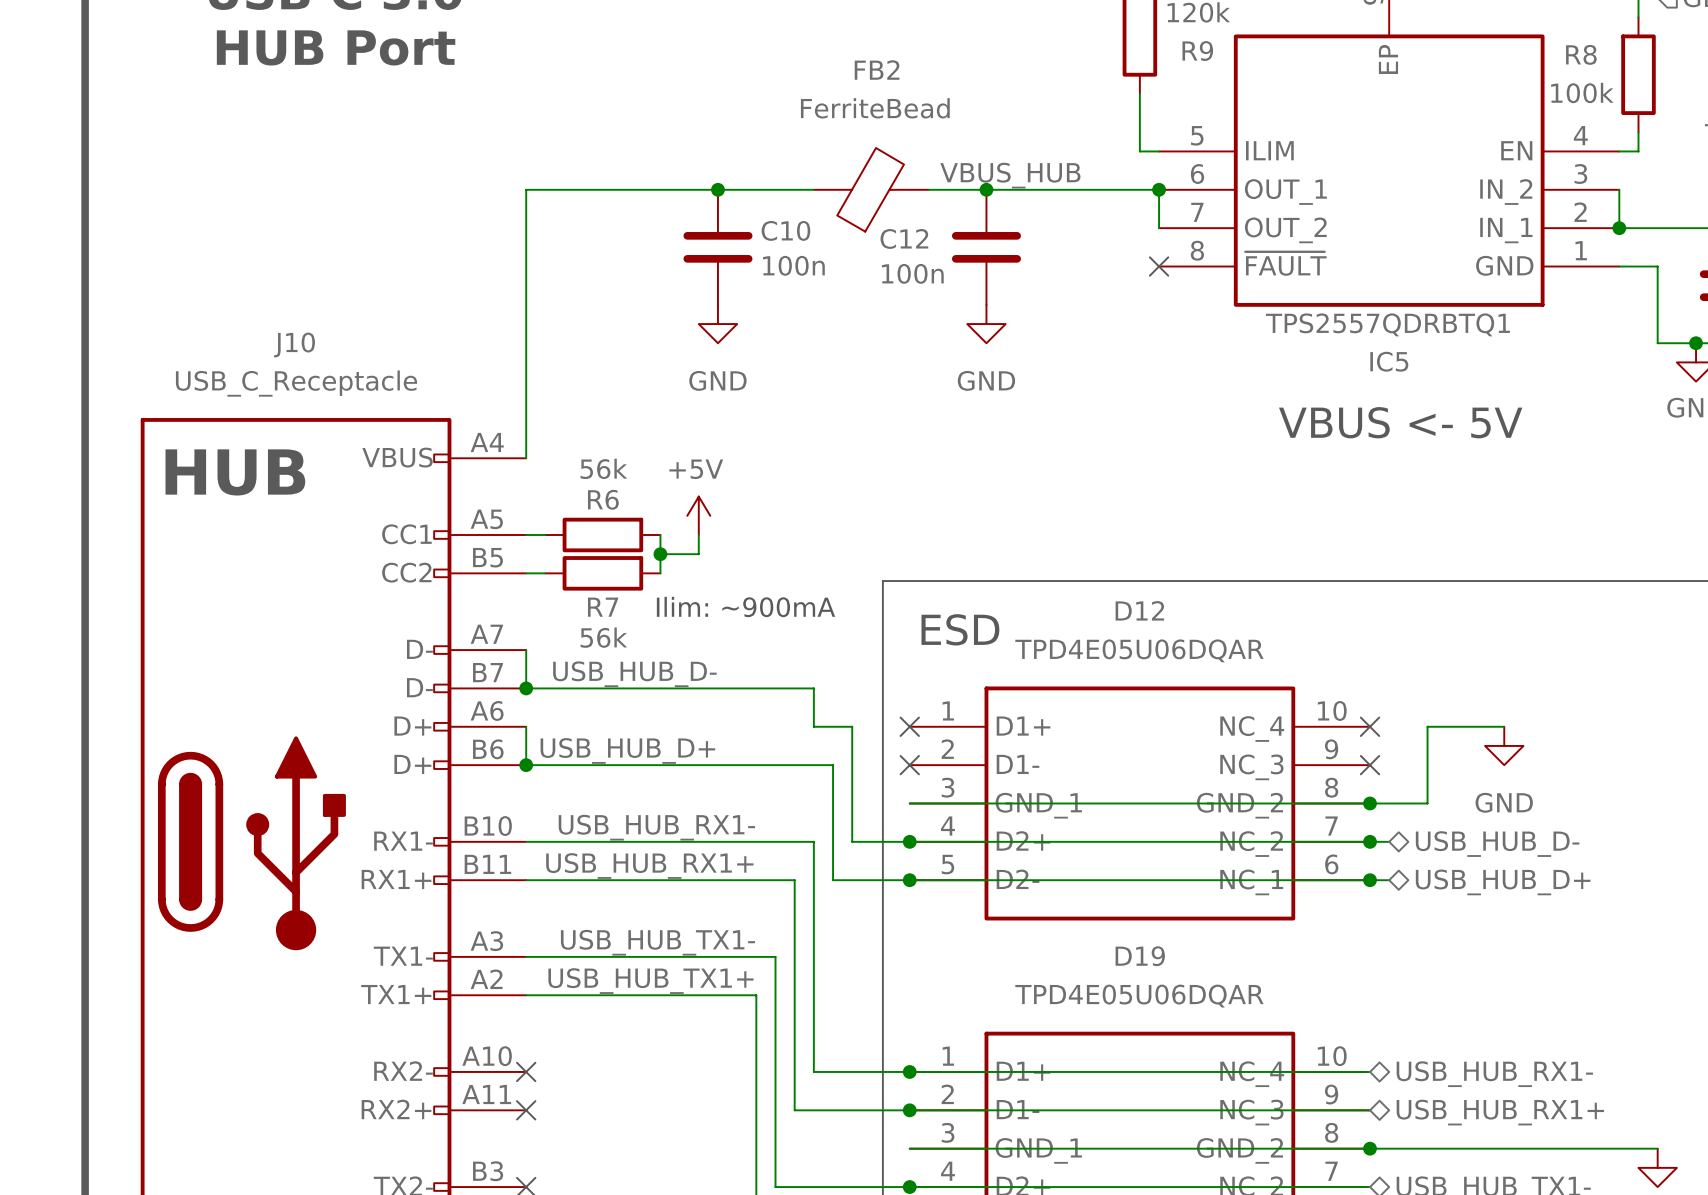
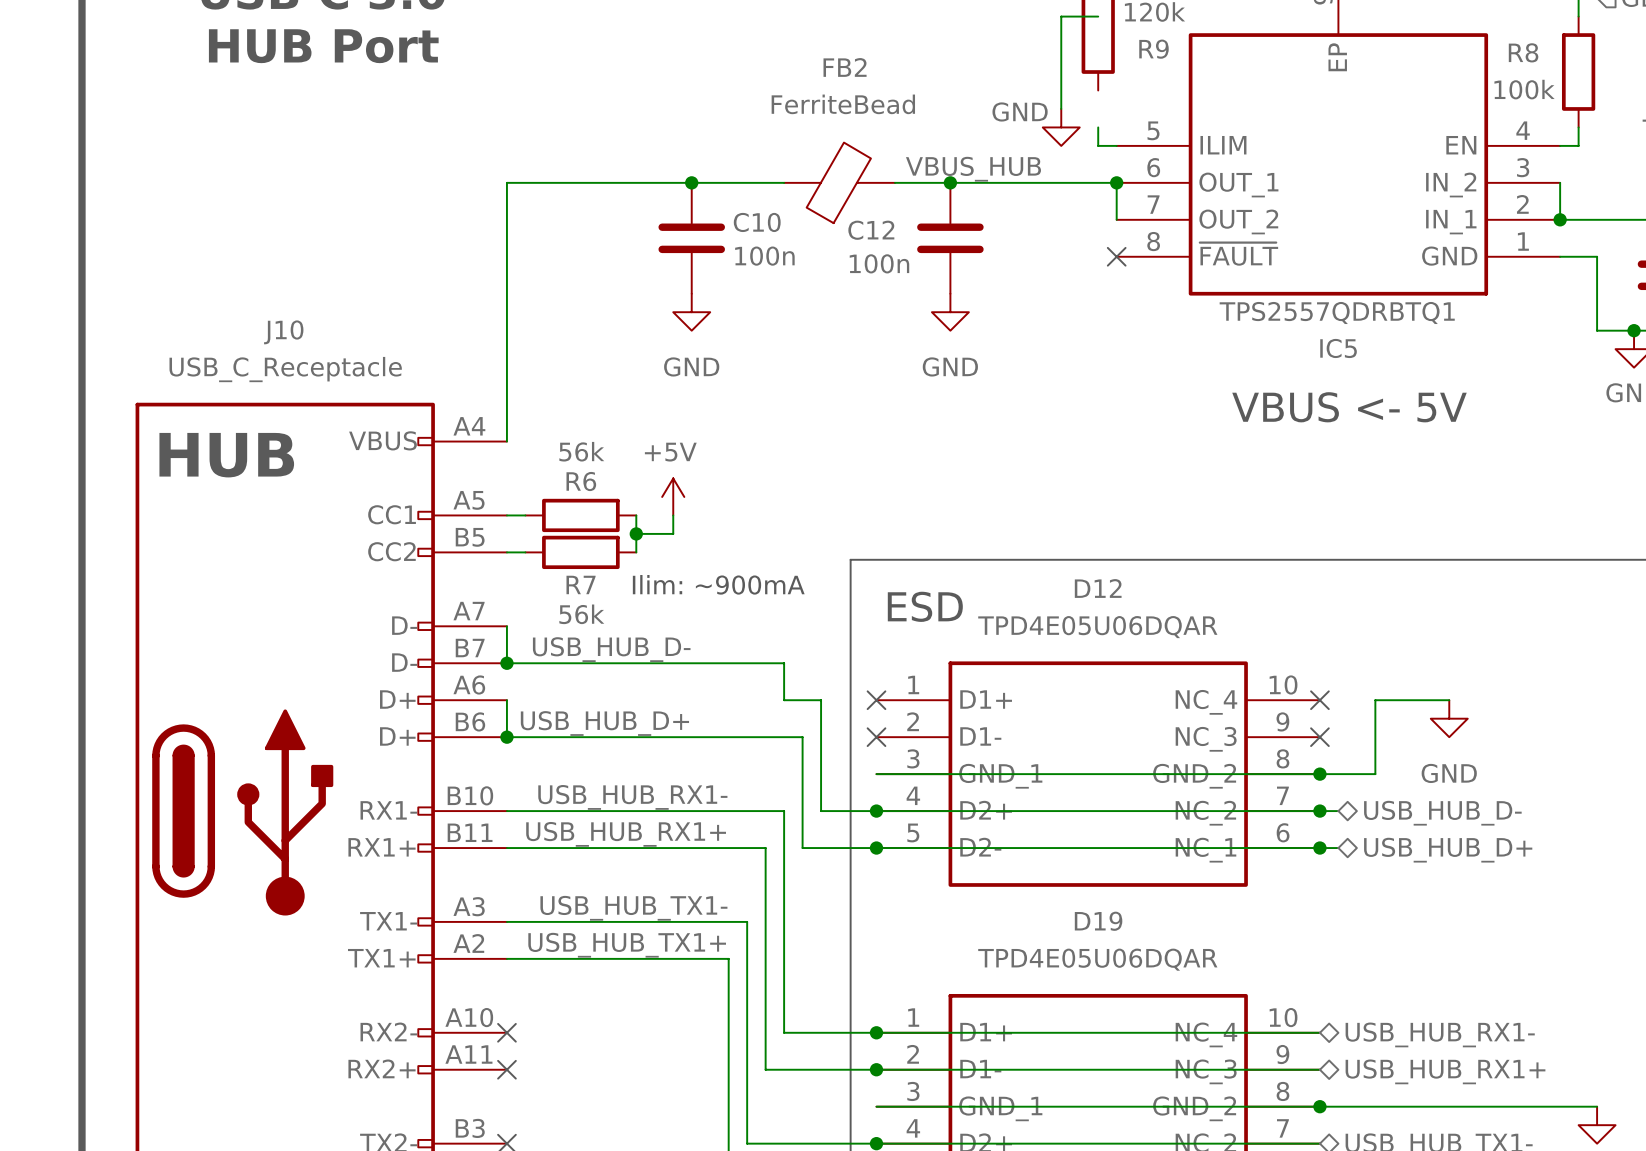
wire: none -> (1098, 16) (1061, 16) (1061, 108)
wire: (1139, 93) (1139, 132) -> none
power symbol: none -> GND (1061, 127)

